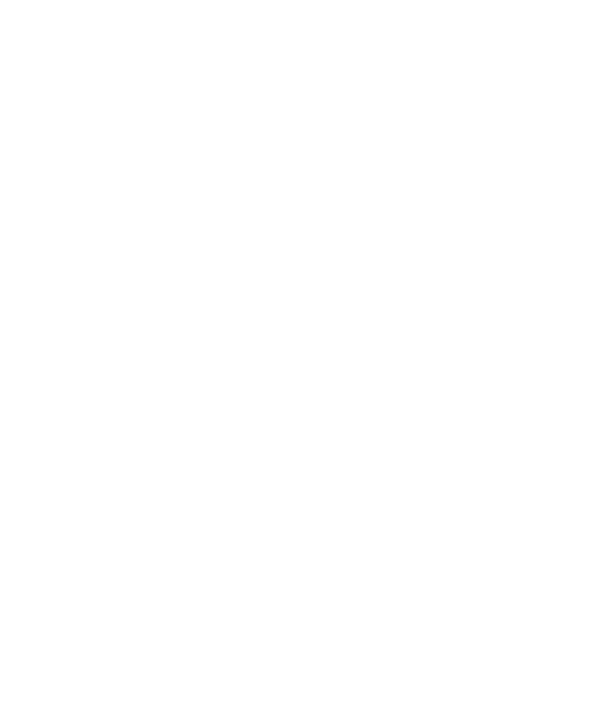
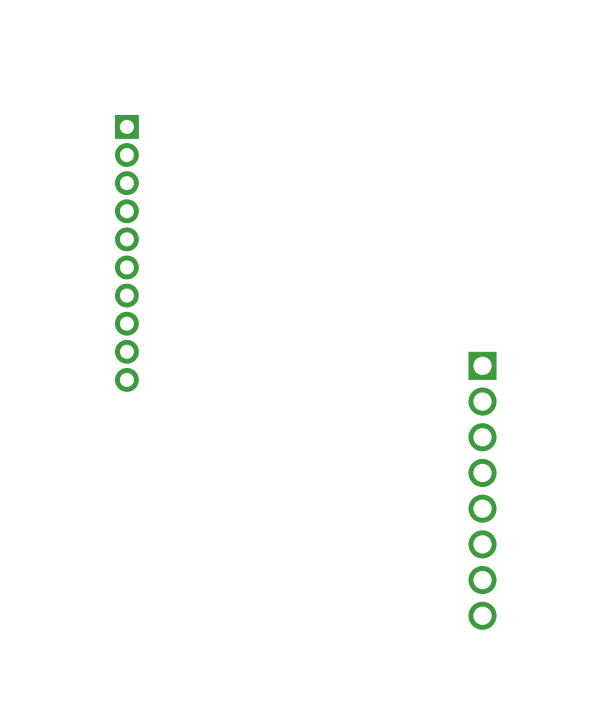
part: none -> (126, 253)
part: none -> (482, 490)

